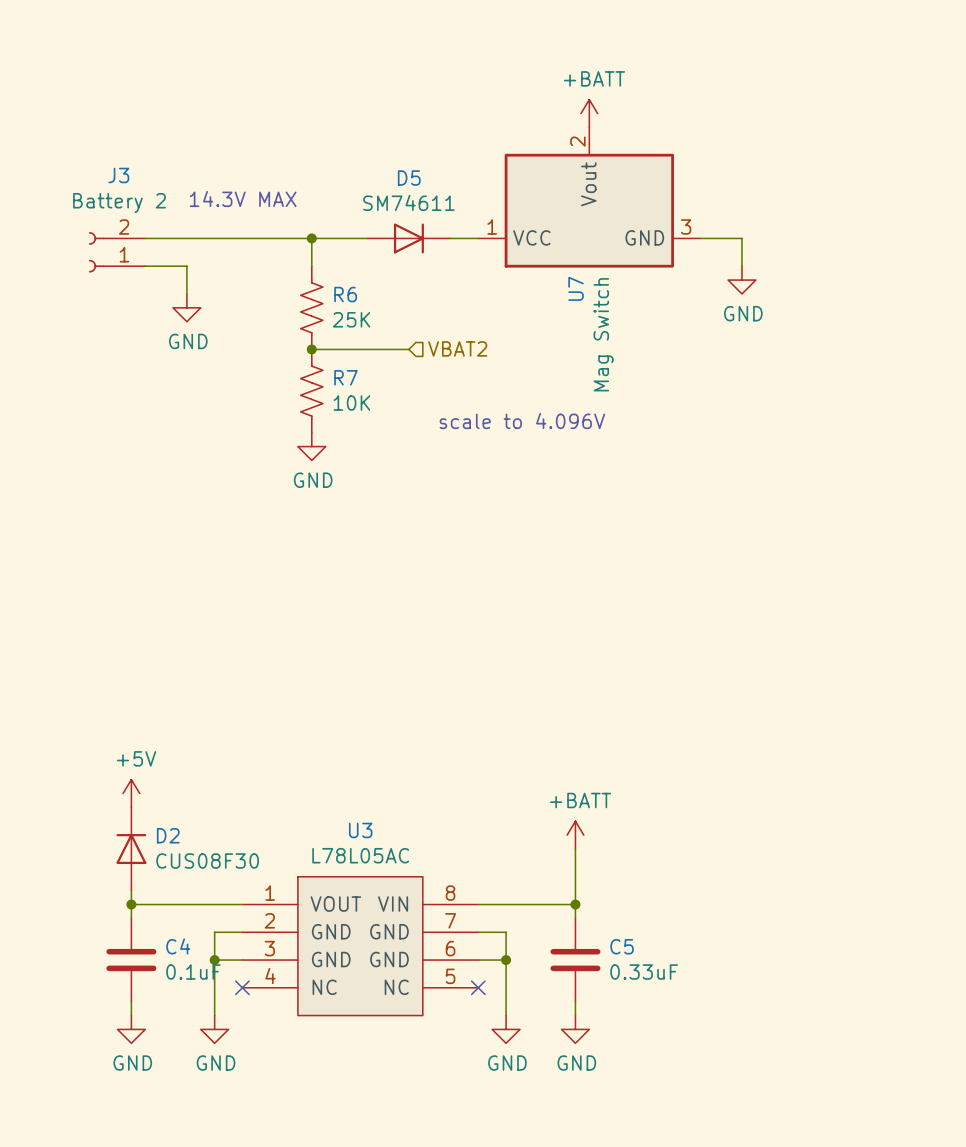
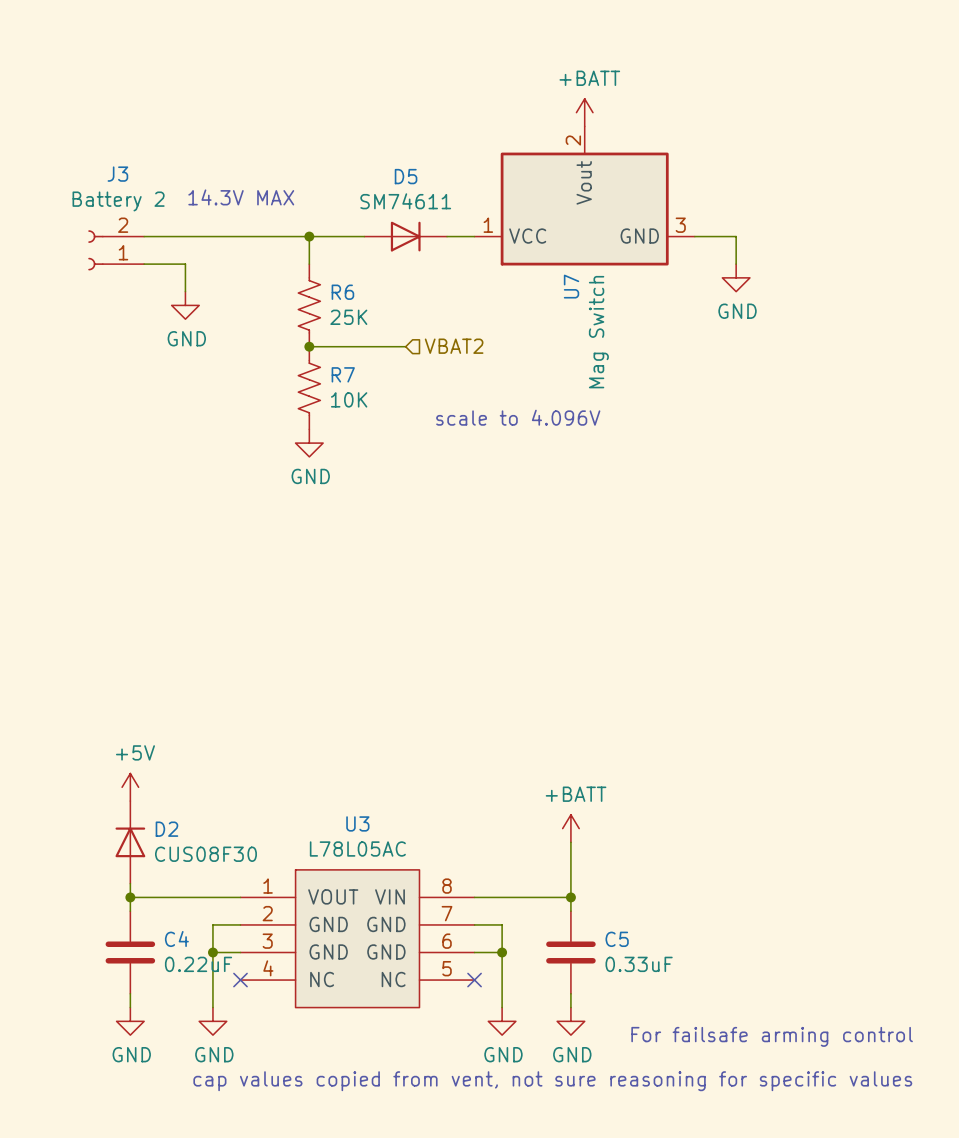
C4 value: 0.1uF (193, 972) -> 0.22uF (198, 964)
text: none -> For failsafe arming control (772, 1036)
text: none -> cap values copied from vent, not sure reasoning for specific values (552, 1081)

